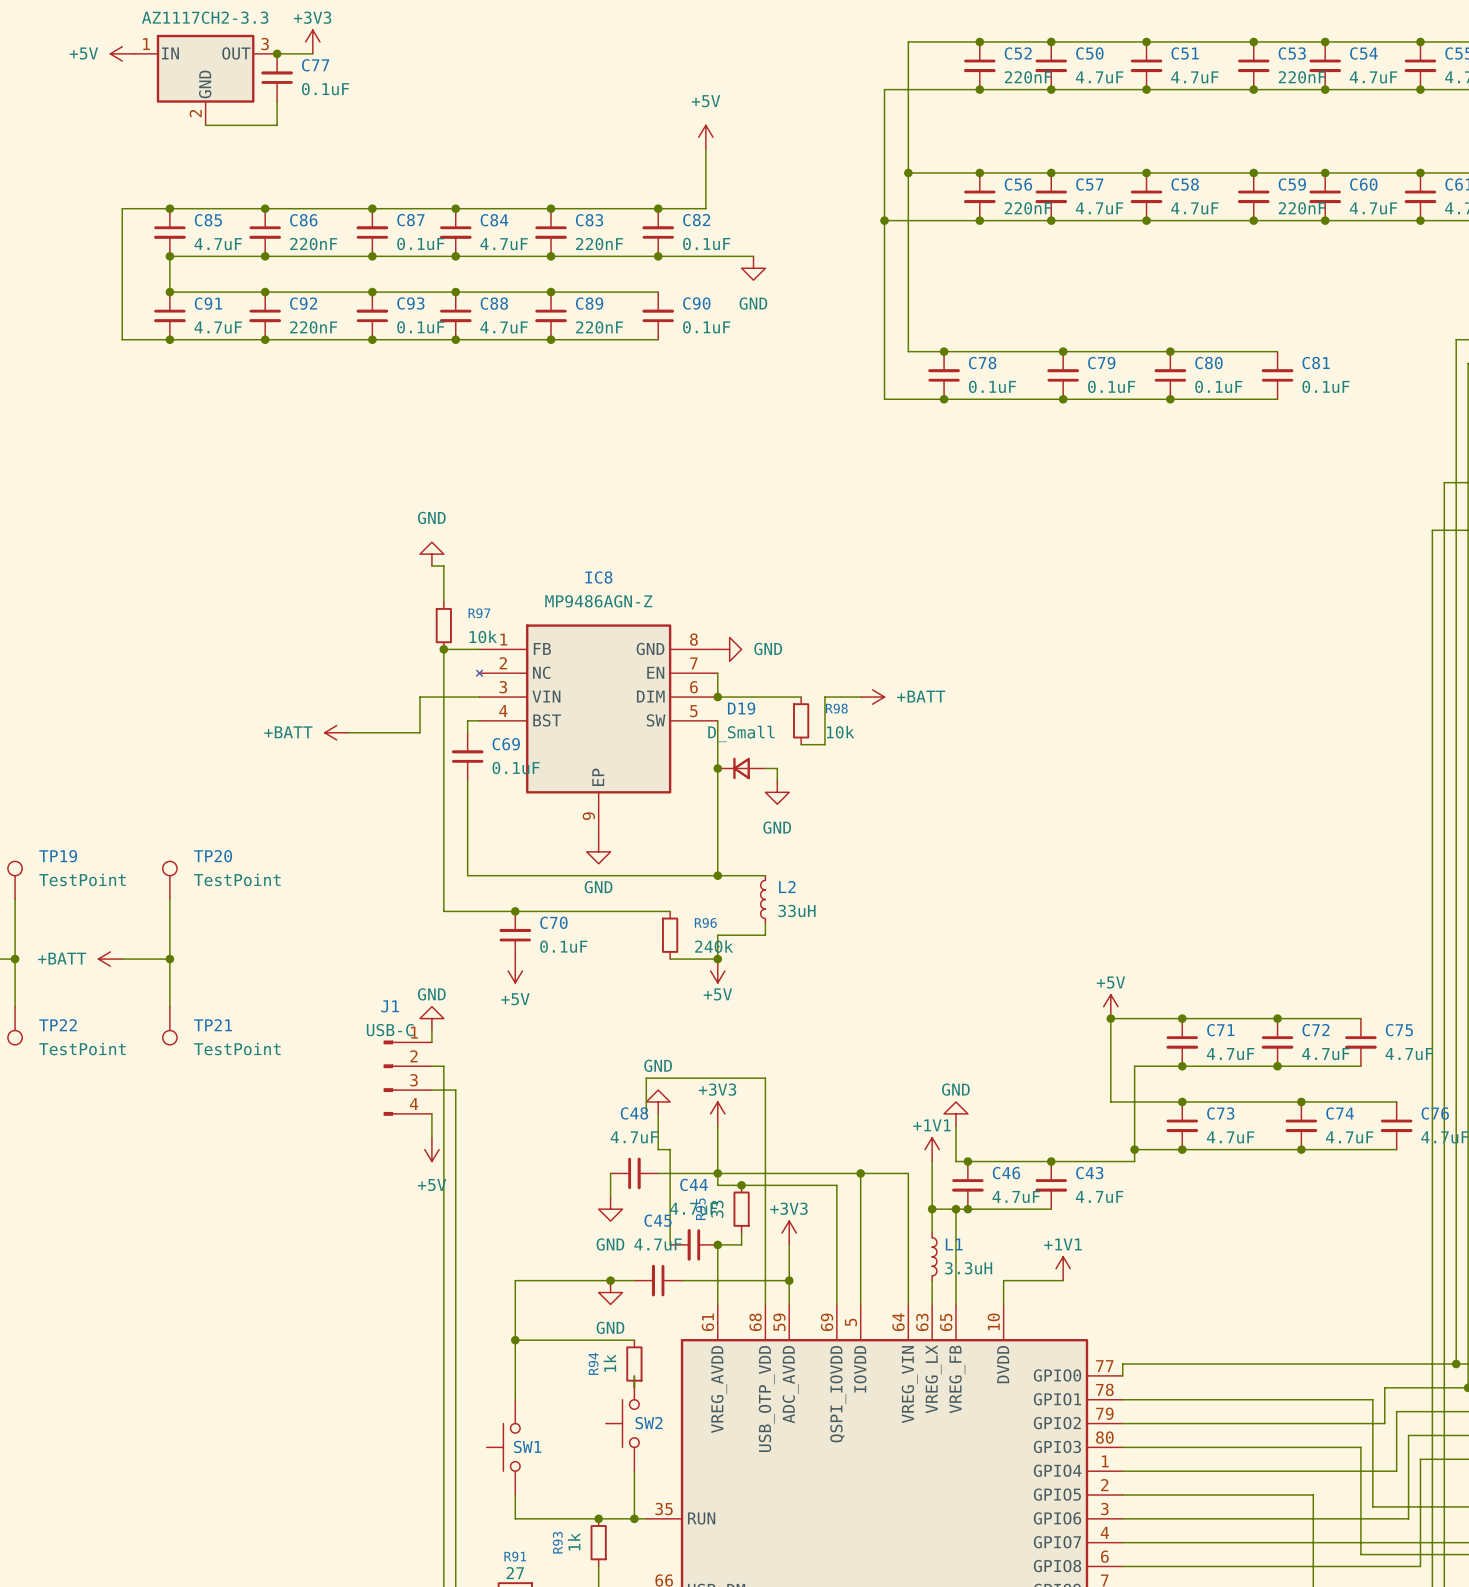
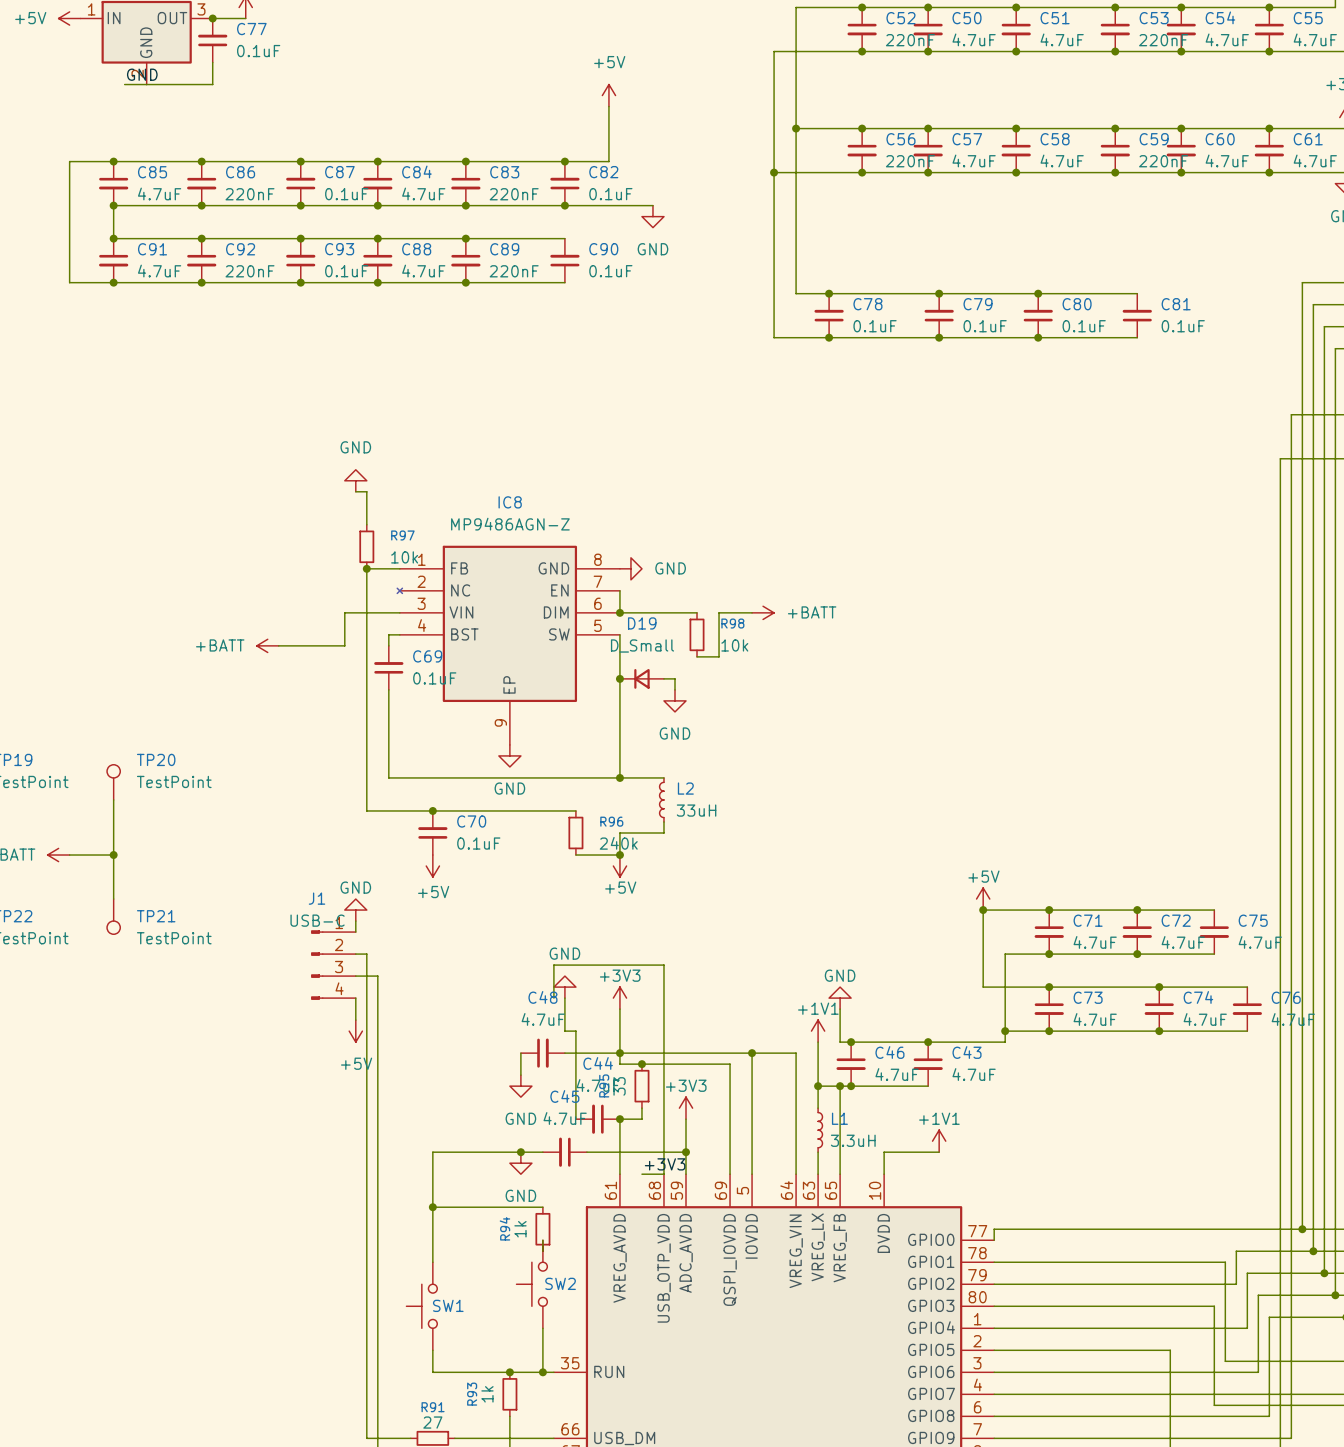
label: none -> GND (142, 74)
wire: none -> (124, 84) (146, 84)
label: none -> +3V3 (665, 1164)
wire: none -> (641, 1174) (663, 1174)

